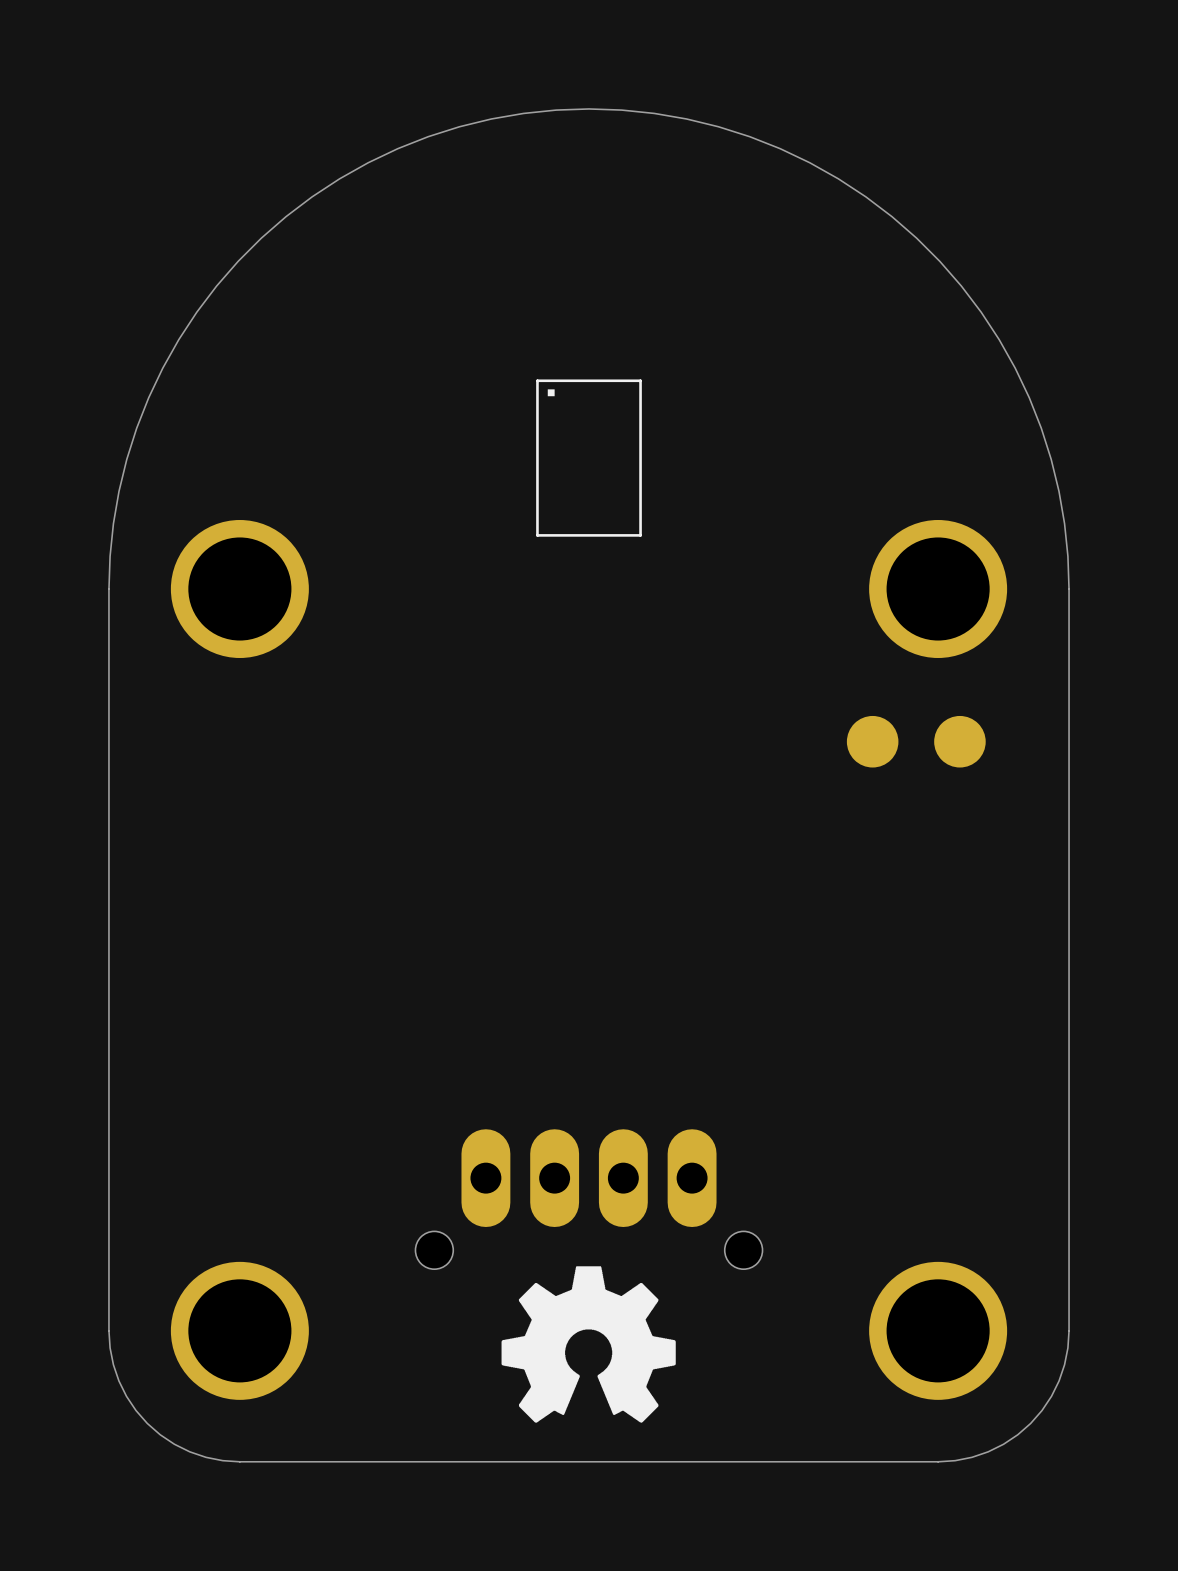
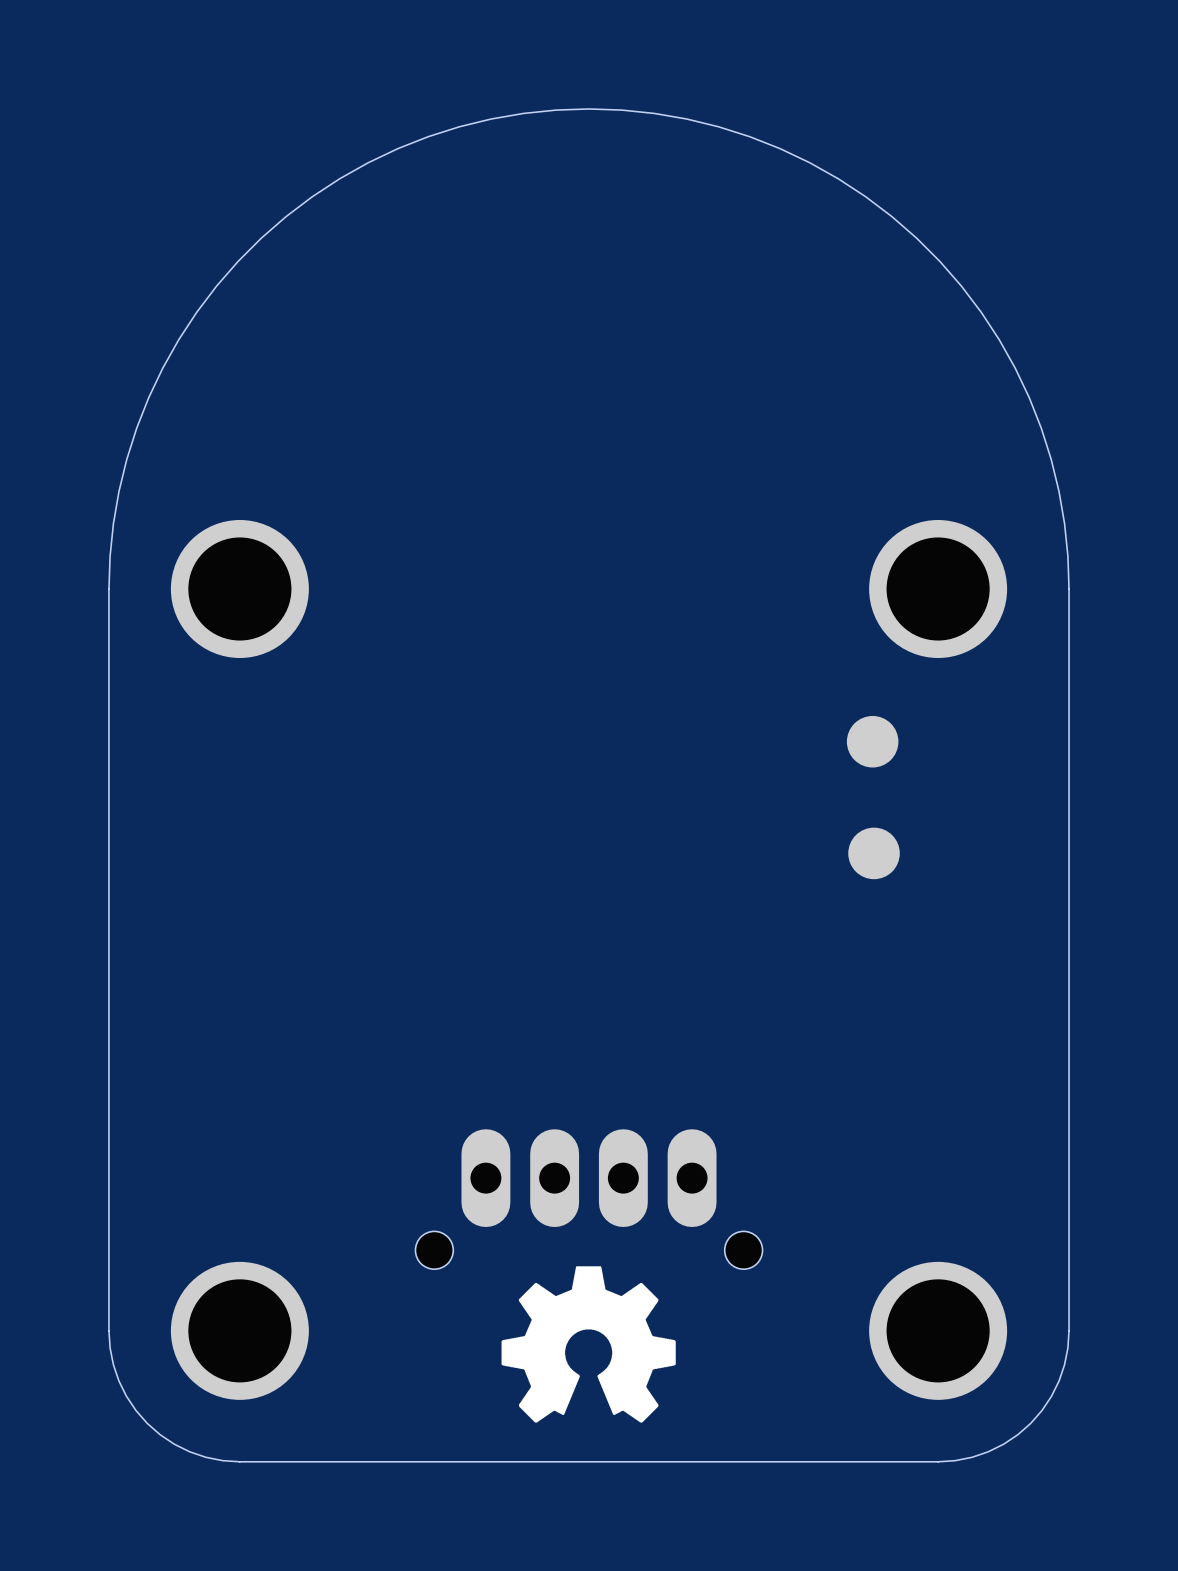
part: (589, 458) -> none
part position: (959, 741) -> (874, 853)

